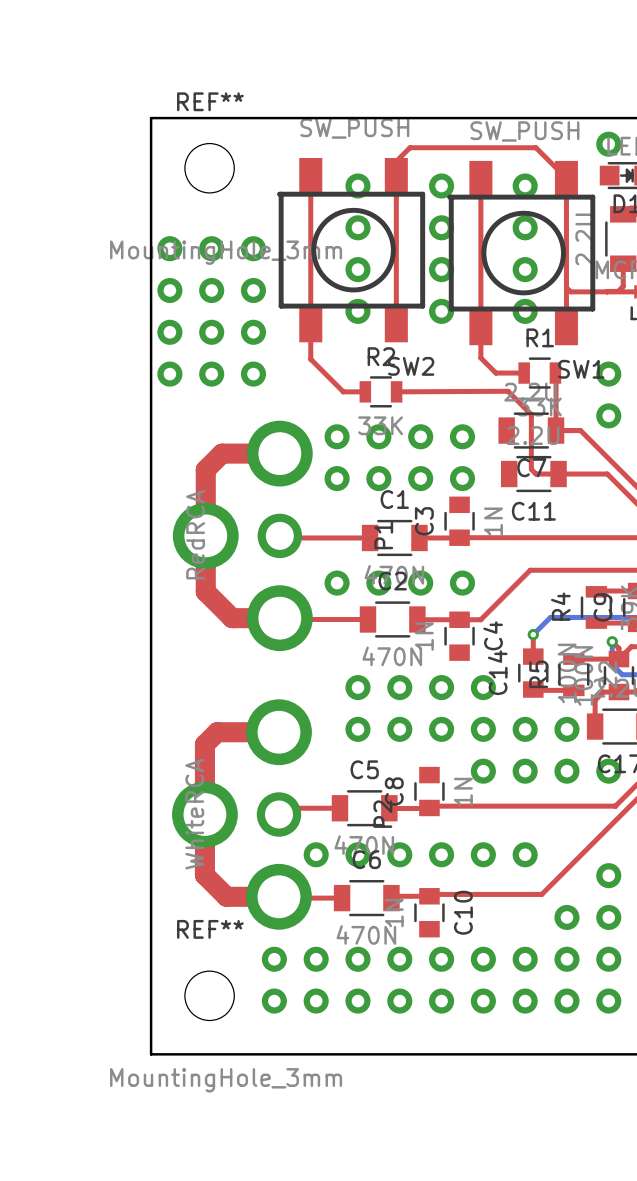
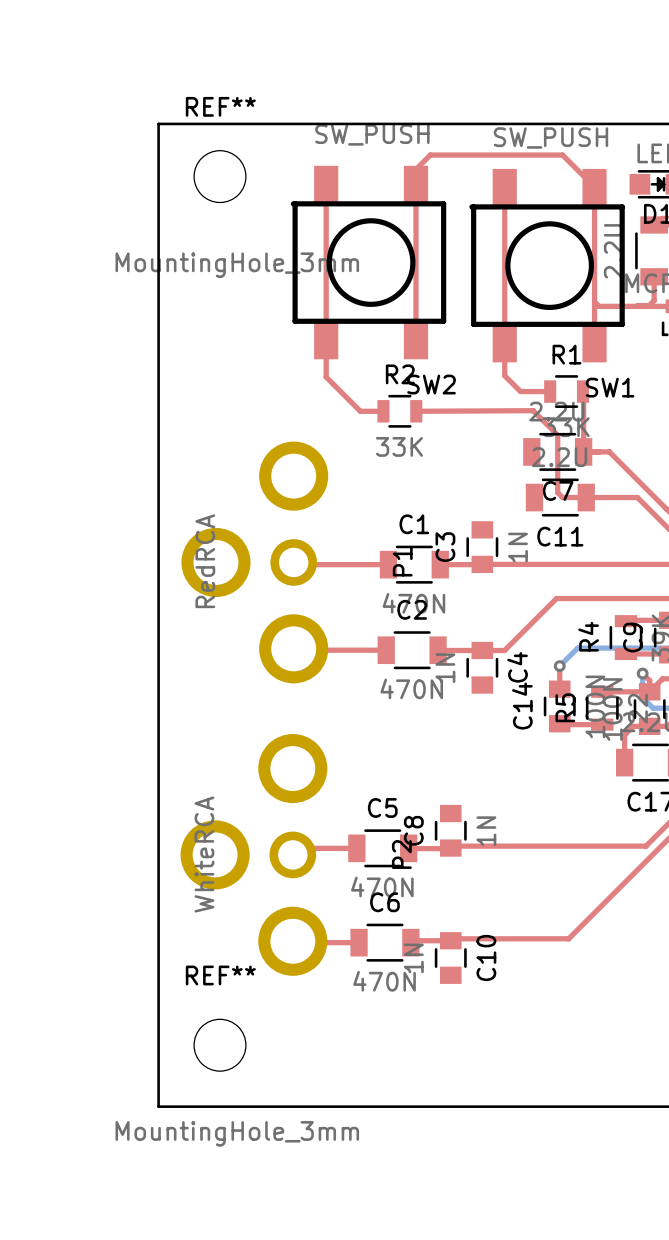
part: (608, 144) -> none
part: (357, 186) -> none
part: (441, 186) -> none
part: (525, 186) -> none
part: (357, 227) -> none
part: (441, 227) -> none
part: (525, 227) -> none
part: (169, 248) -> none
part: (211, 248) -> none
part: (253, 248) -> none
part: (357, 269) -> none
part: (441, 269) -> none
part: (525, 269) -> none
part: (169, 290) -> none
part: (211, 290) -> none
part: (253, 290) -> none
part: (357, 311) -> none
part: (441, 311) -> none
part: (525, 311) -> none
part: (169, 332) -> none
part: (211, 332) -> none
part: (253, 332) -> none
part: (169, 374) -> none
part: (211, 374) -> none
part: (253, 374) -> none
part: (608, 374) -> none
part: (608, 415) -> none
part: (337, 436) -> none
part: (378, 436) -> none
part: (420, 436) -> none
part: (462, 436) -> none
top track: (279, 453) (222, 453) (205, 469) (205, 591) (232, 618) (279, 618) -> none
part: (337, 478) -> none
part: (378, 478) -> none
part: (420, 478) -> none
part: (462, 478) -> none
part: (337, 583) -> none
part: (378, 583) -> none
part: (420, 583) -> none
part: (462, 583) -> none
part: (357, 687) -> none
part: (399, 687) -> none
part: (441, 687) -> none
part: (483, 687) -> none
part: (357, 729) -> none
part: (399, 729) -> none
part: (441, 729) -> none
part: (483, 729) -> none
part: (525, 729) -> none
part: (566, 729) -> none
top track: (278, 732) (217, 732) (204, 744) (204, 875) (226, 896) (278, 896) -> none
part: (483, 771) -> none
part: (525, 771) -> none
part: (566, 771) -> none
part: (608, 771) -> none
part: (316, 854) -> none
part: (357, 854) -> none
part: (399, 854) -> none
part: (441, 854) -> none
part: (483, 854) -> none
part: (525, 854) -> none
part: (608, 875) -> none
part: (566, 917) -> none
part: (608, 917) -> none
part: (274, 959) -> none
part: (316, 959) -> none
part: (357, 959) -> none
part: (399, 959) -> none
part: (441, 959) -> none
part: (483, 959) -> none
part: (525, 959) -> none
part: (566, 959) -> none
part: (608, 959) -> none
part: (274, 1001) -> none
part: (316, 1001) -> none
part: (357, 1001) -> none
part: (399, 1001) -> none
part: (441, 1001) -> none
part: (483, 1001) -> none
part: (525, 1001) -> none
part: (566, 1001) -> none
part: (608, 1001) -> none

